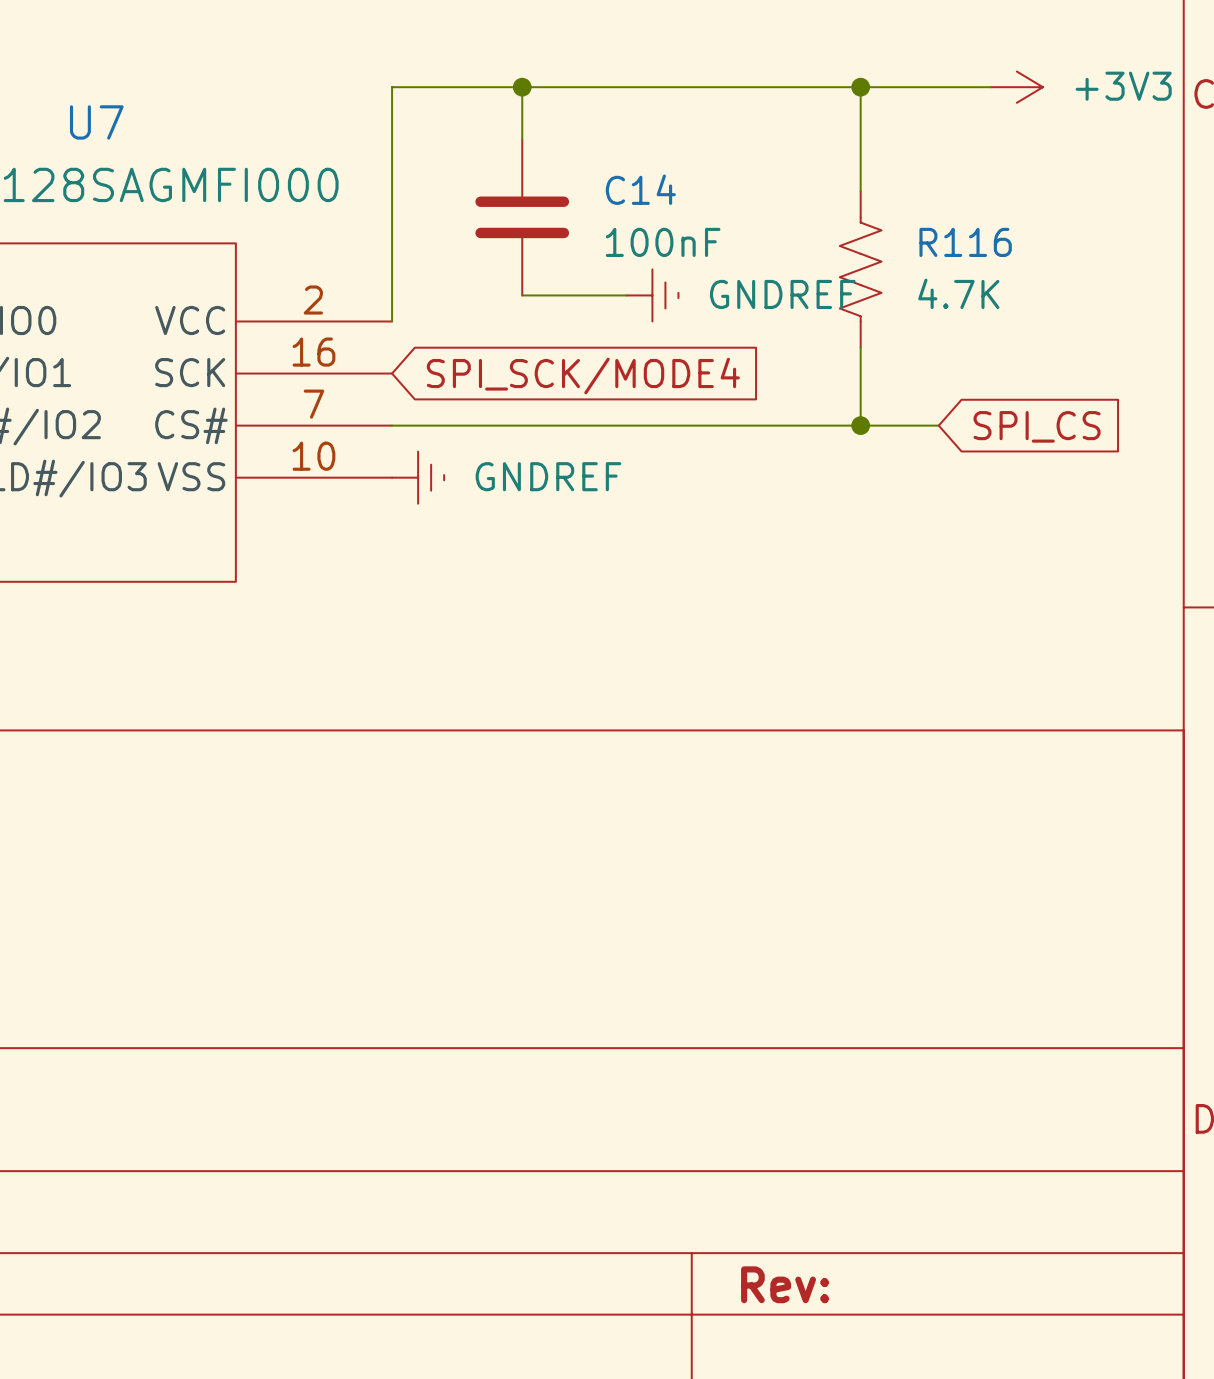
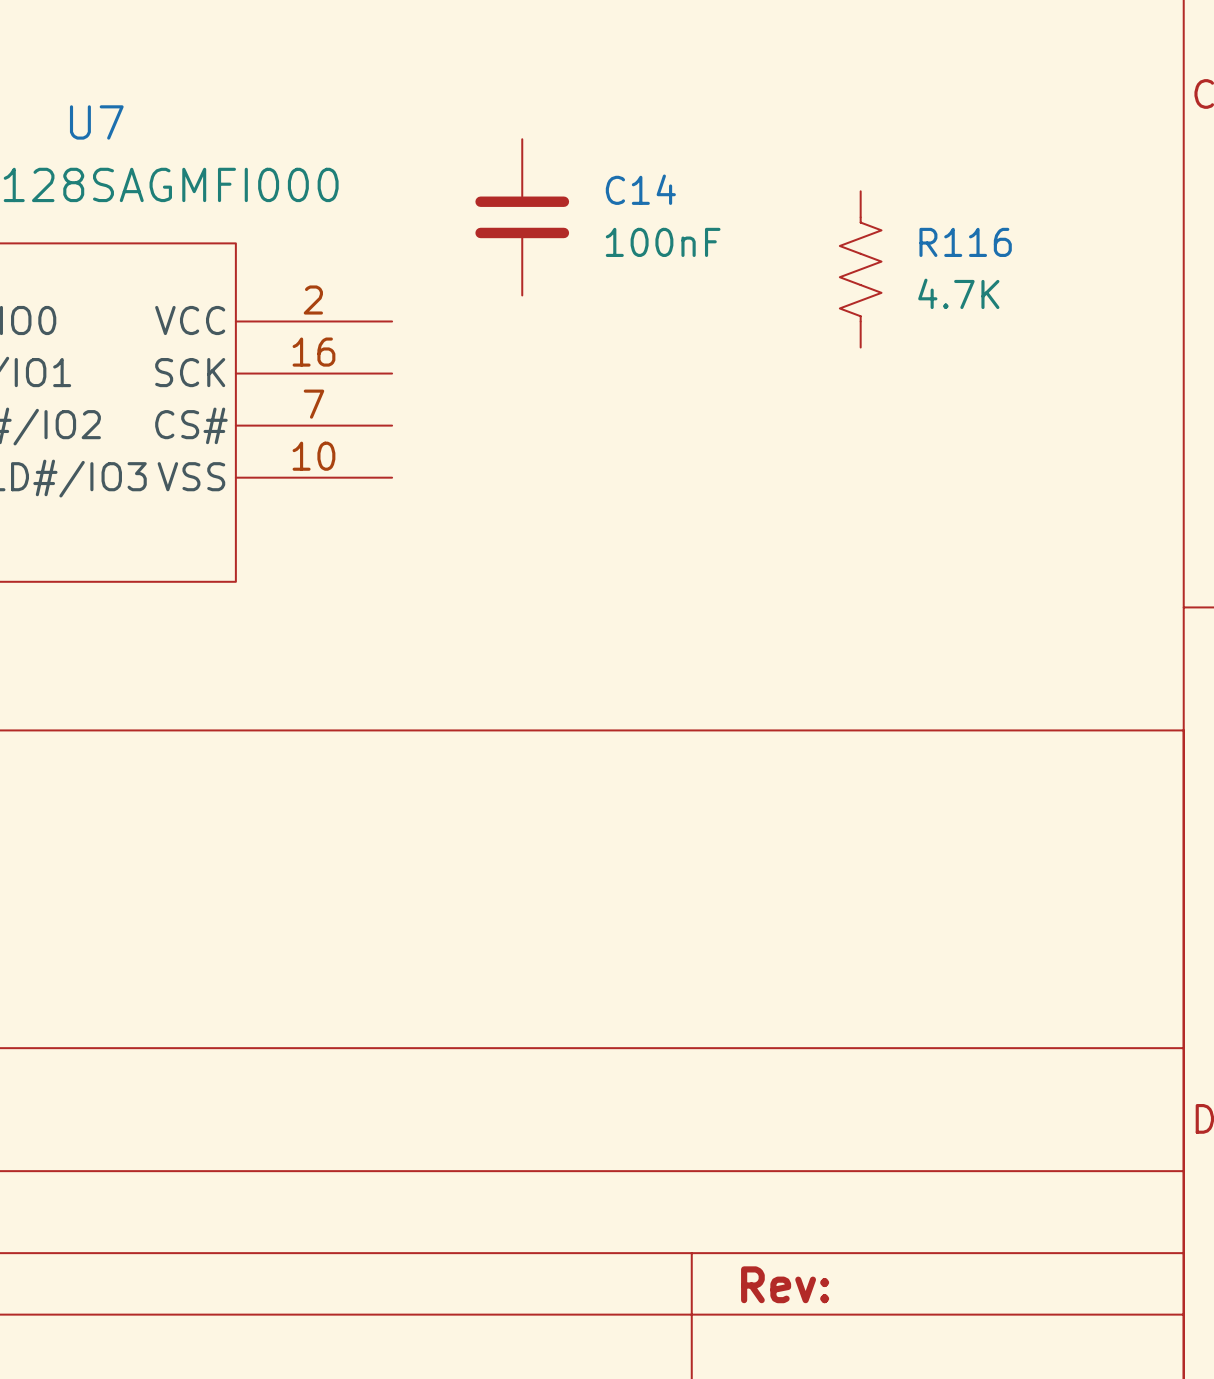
wire: (522, 87) (522, 139) -> none
junction: (522, 87) -> none
wire: (860, 87) (860, 191) -> none
junction: (860, 87) -> none
wire: (990, 87) (392, 87) (392, 321) -> none
power symbol: +3V3 (1016, 87) -> none
wire: (522, 295) (626, 295) -> none
power symbol: GNDREF (652, 295) -> none
wire: (860, 347) (860, 425) -> none
global label: SPI_SCK/MODE4 (583, 376) -> none
wire: (392, 425) (938, 425) -> none
junction: (860, 425) -> none
global label: SPI_CS (1037, 426) -> none
power symbol: GNDREF (418, 477) -> none

